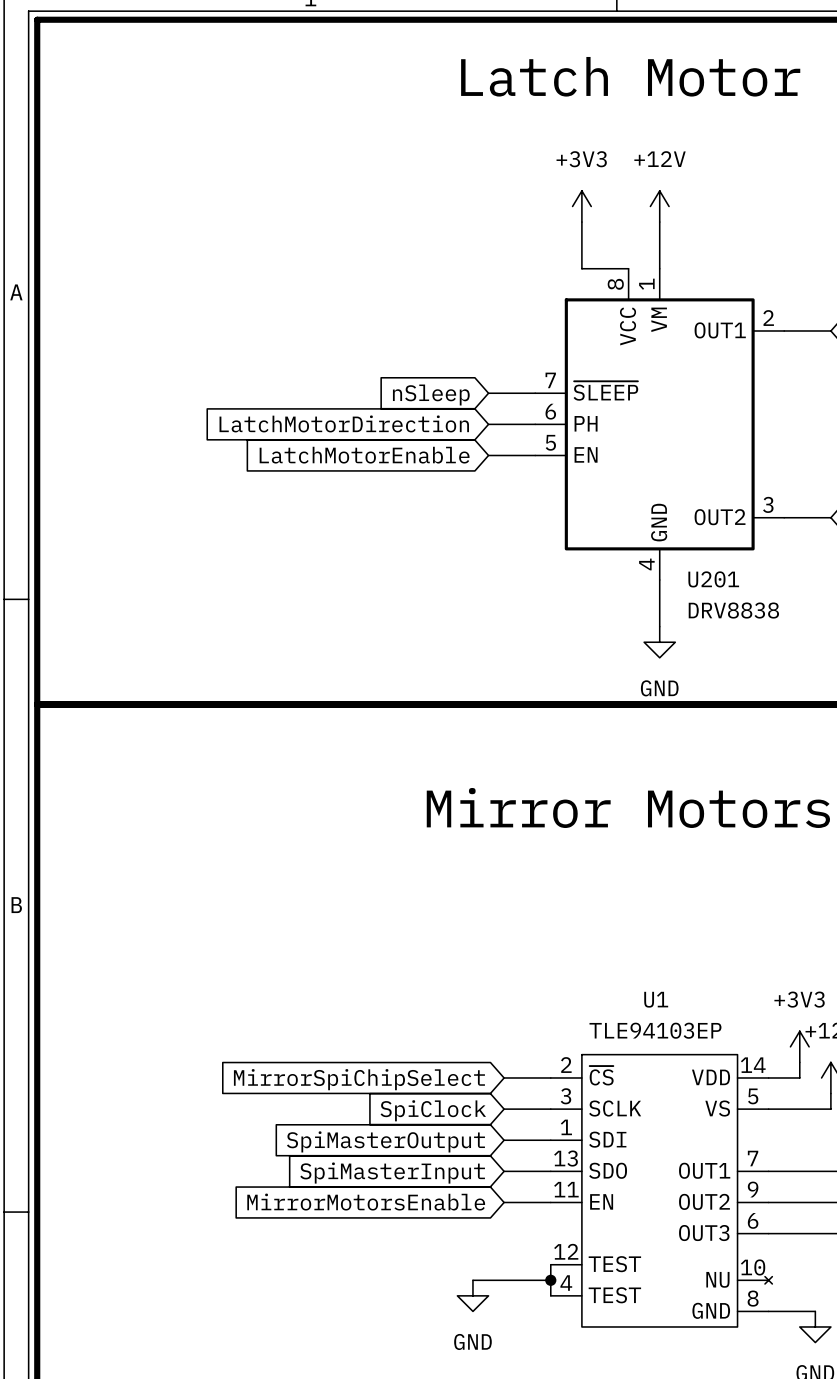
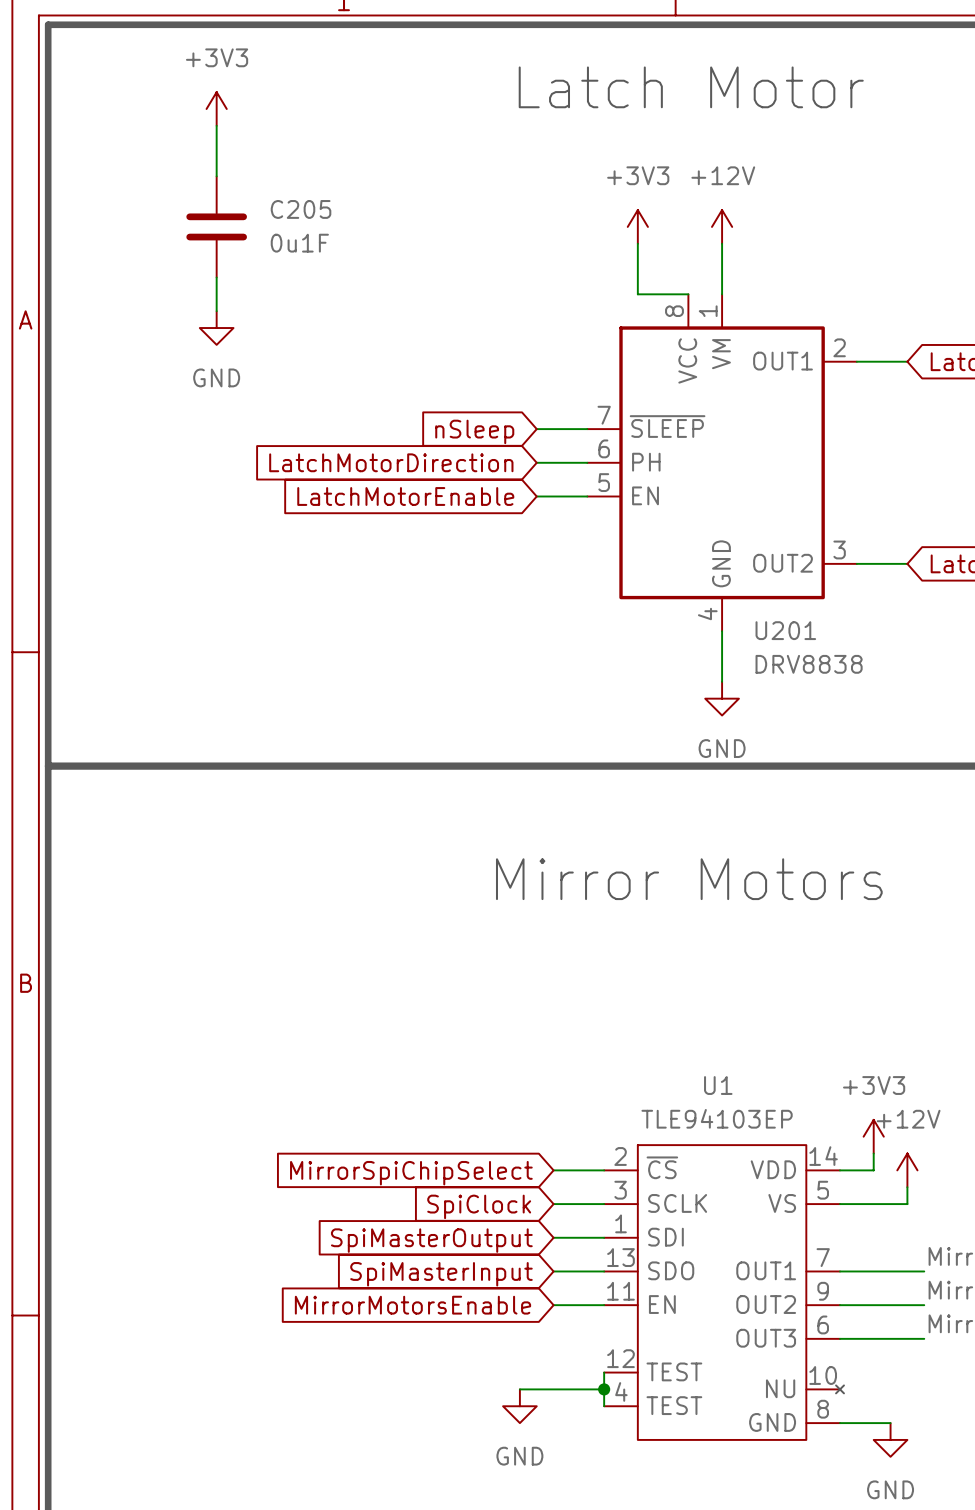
power symbol: none -> +3V3 (216, 109)
wire: none -> (216, 125) (216, 176)
C205: none -> 0u1F (216, 226)
wire: none -> (216, 277) (216, 311)
power symbol: none -> GND (216, 328)

